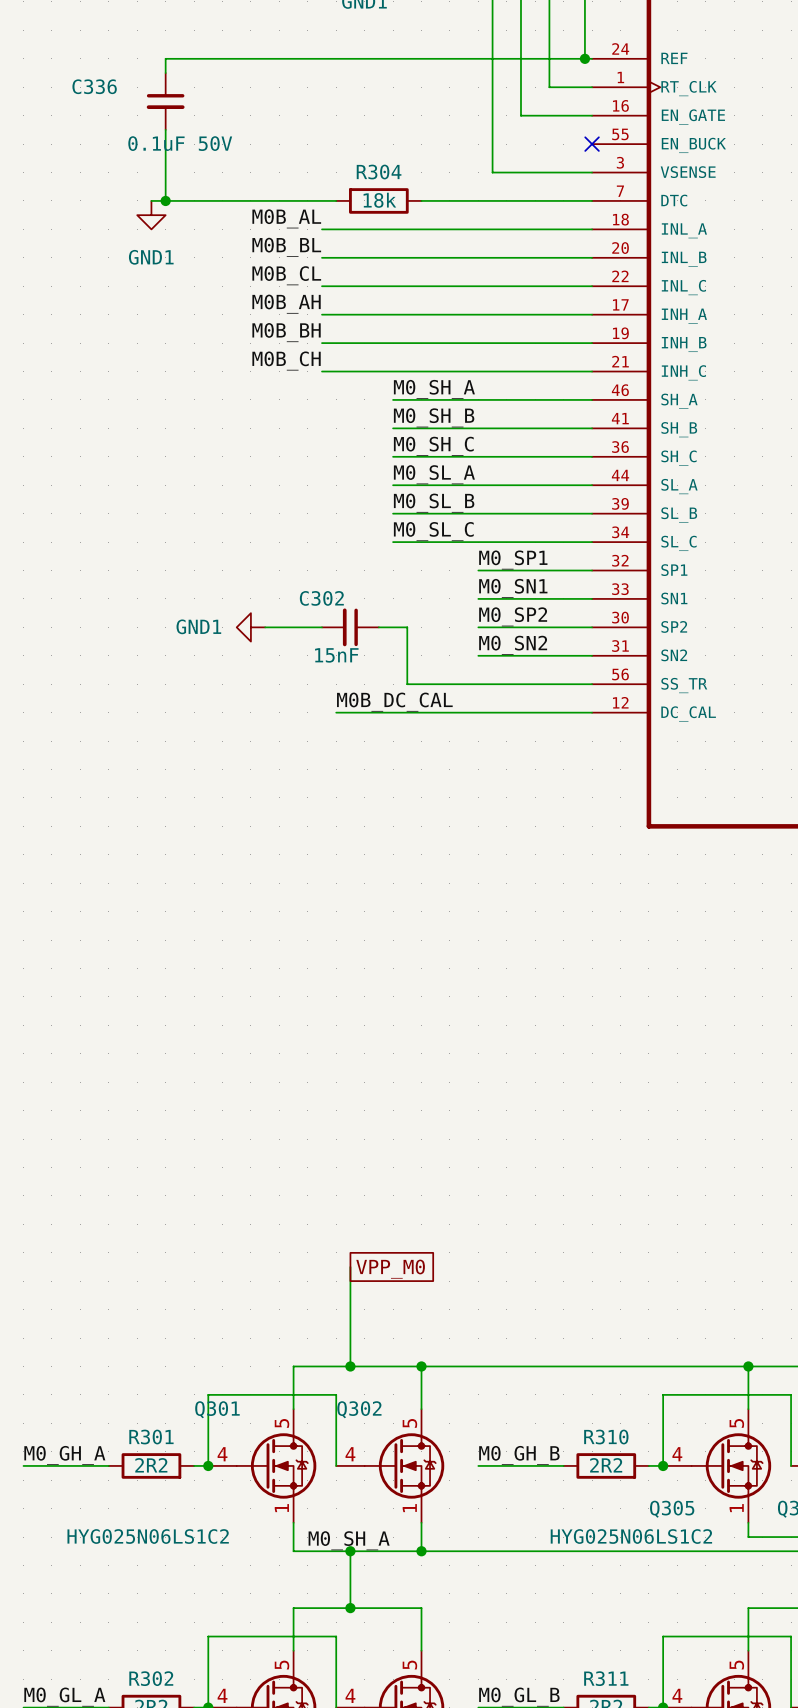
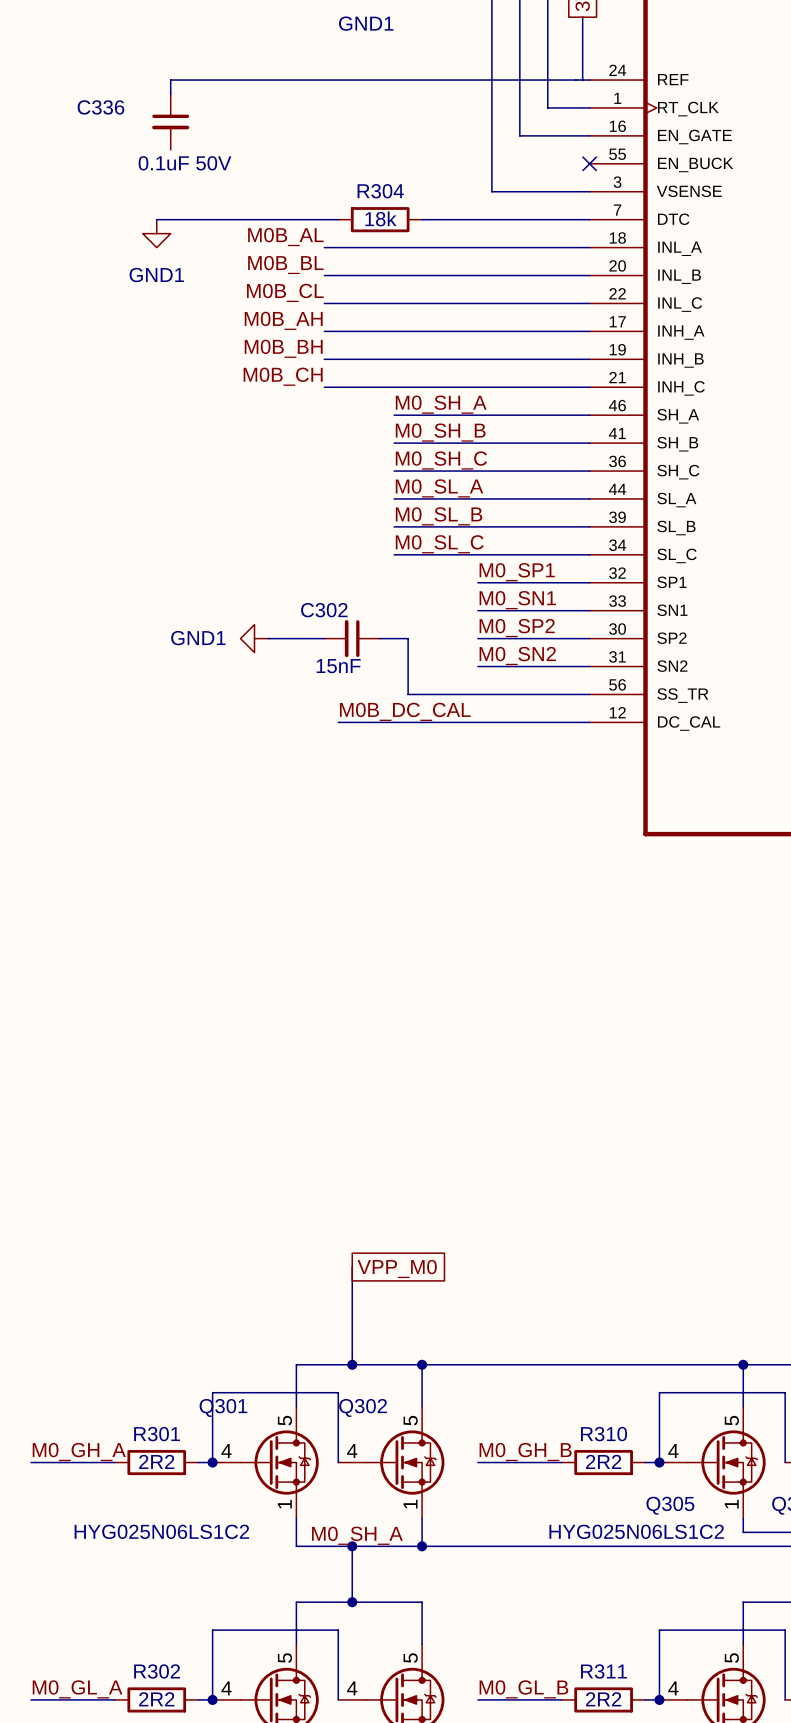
junction: (584, 58) -> none
wire: (165, 129) (165, 200) -> none
junction: (165, 200) -> none

